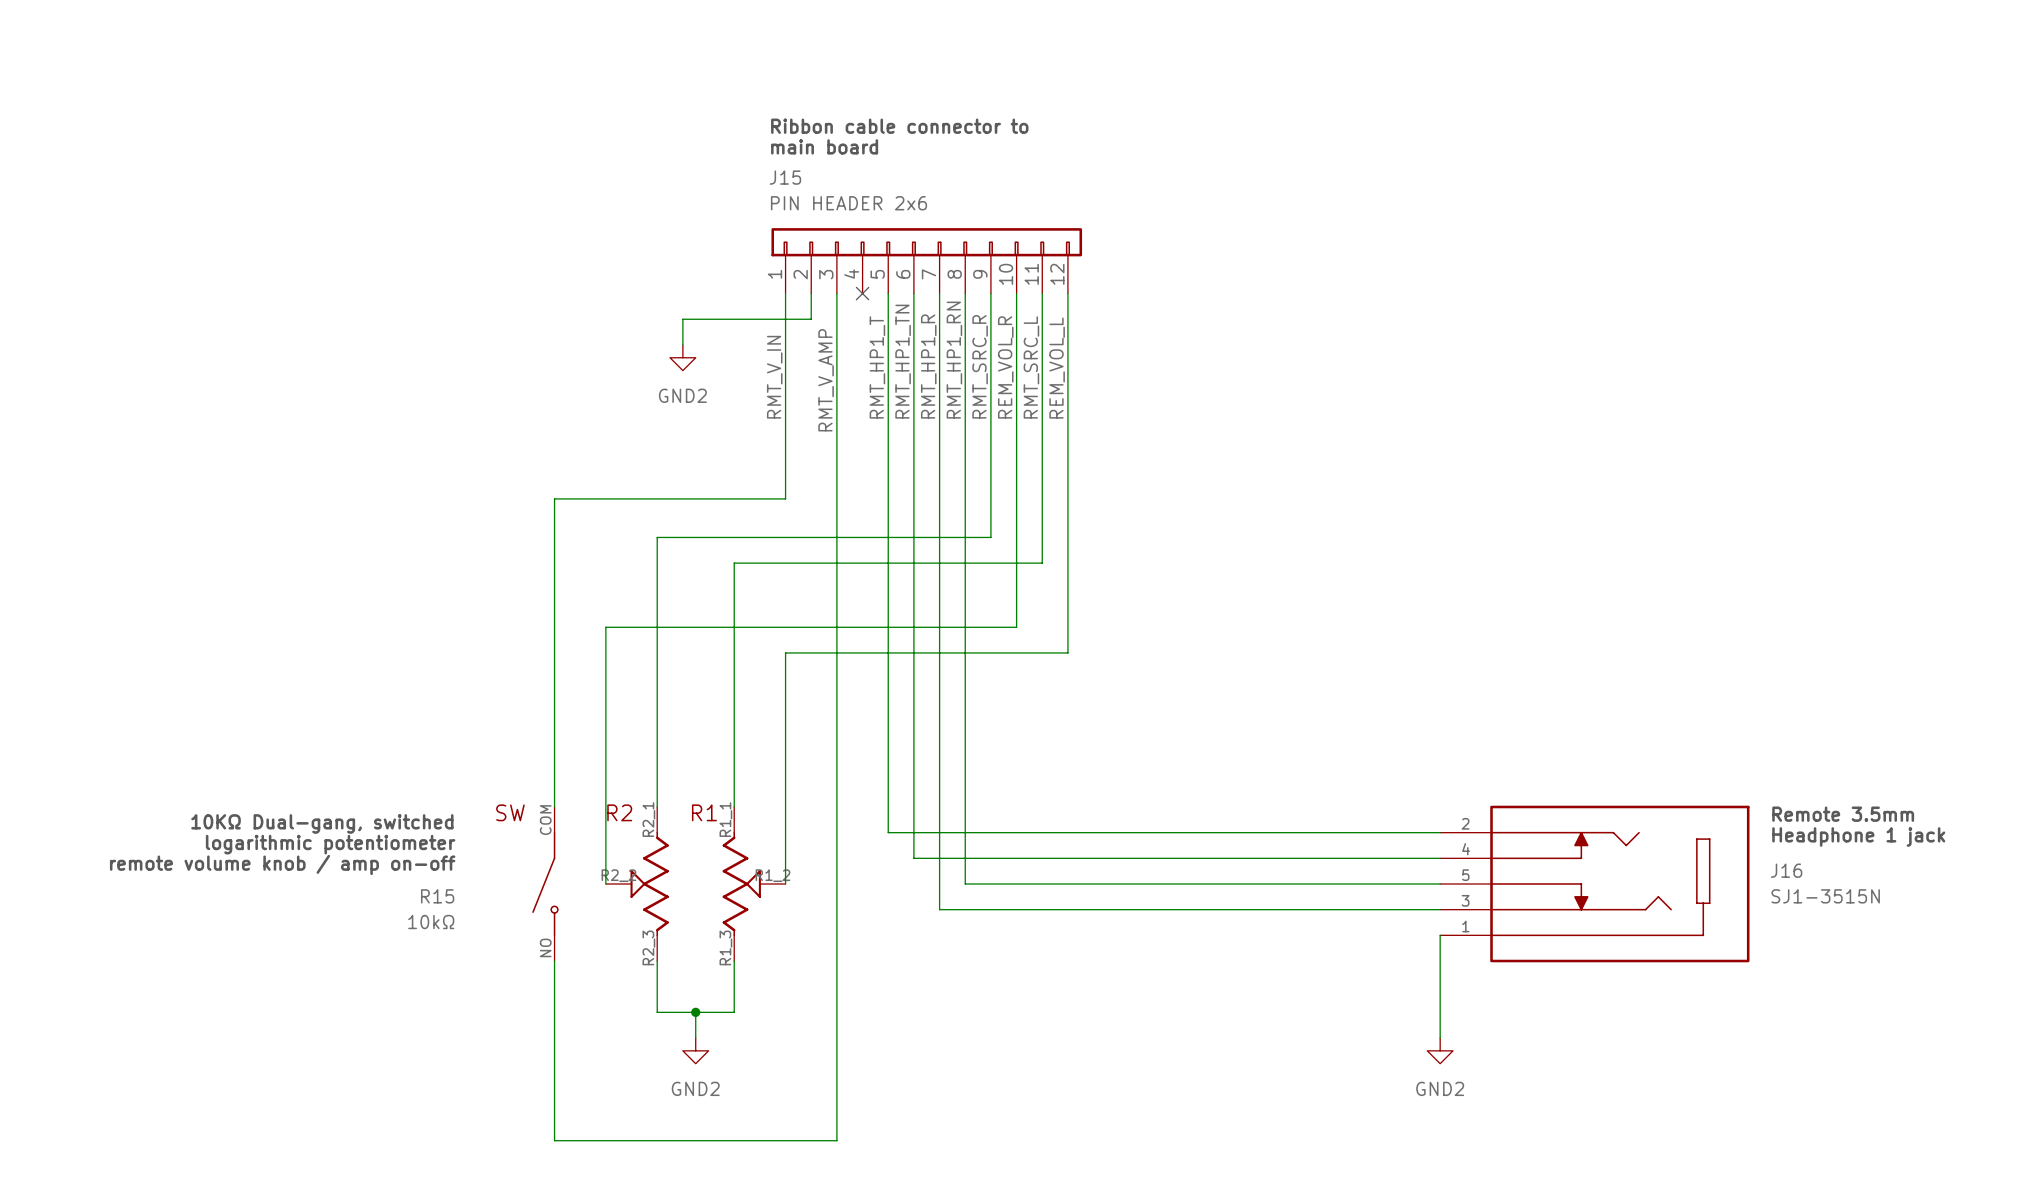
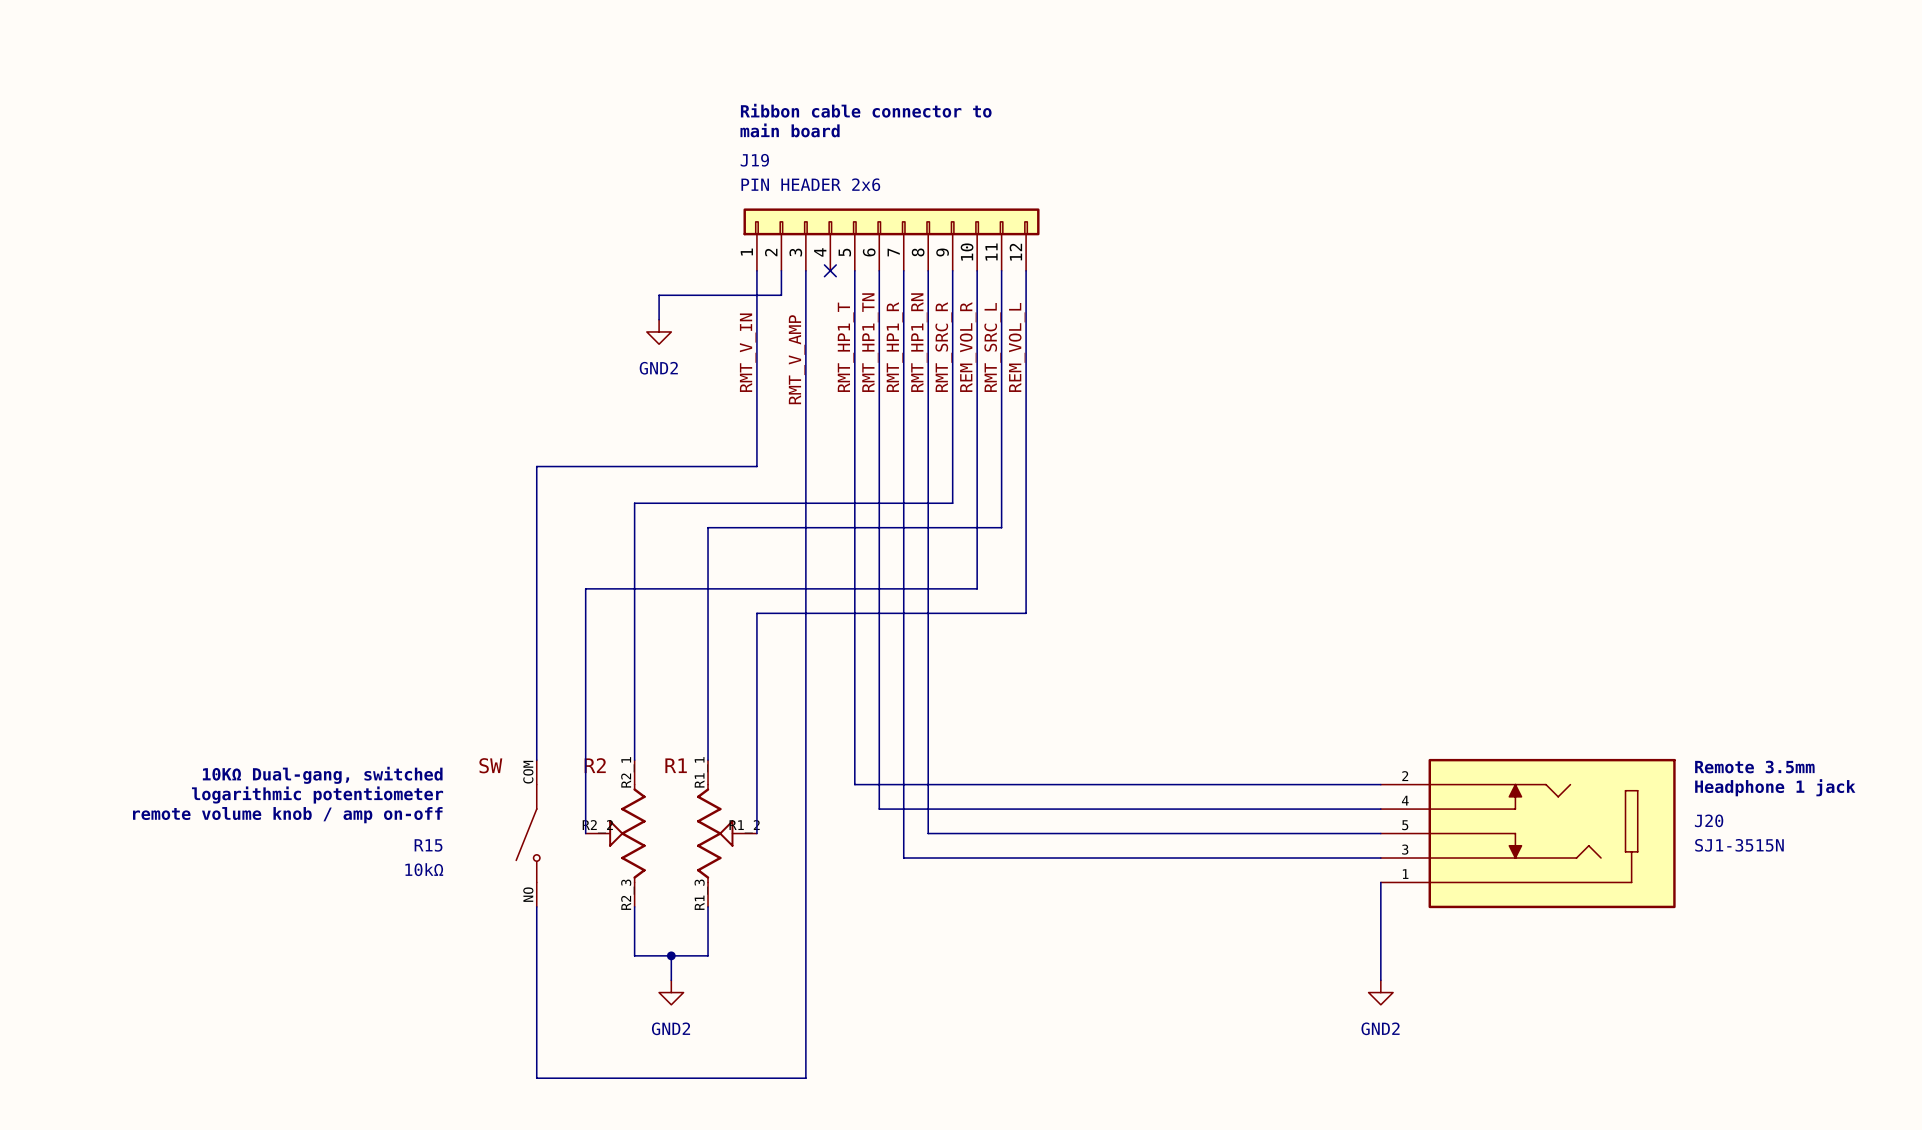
J15 name: J15 (785, 177) -> J19 (754, 160)
J16 name: J16 (1786, 870) -> J20 (1709, 820)

